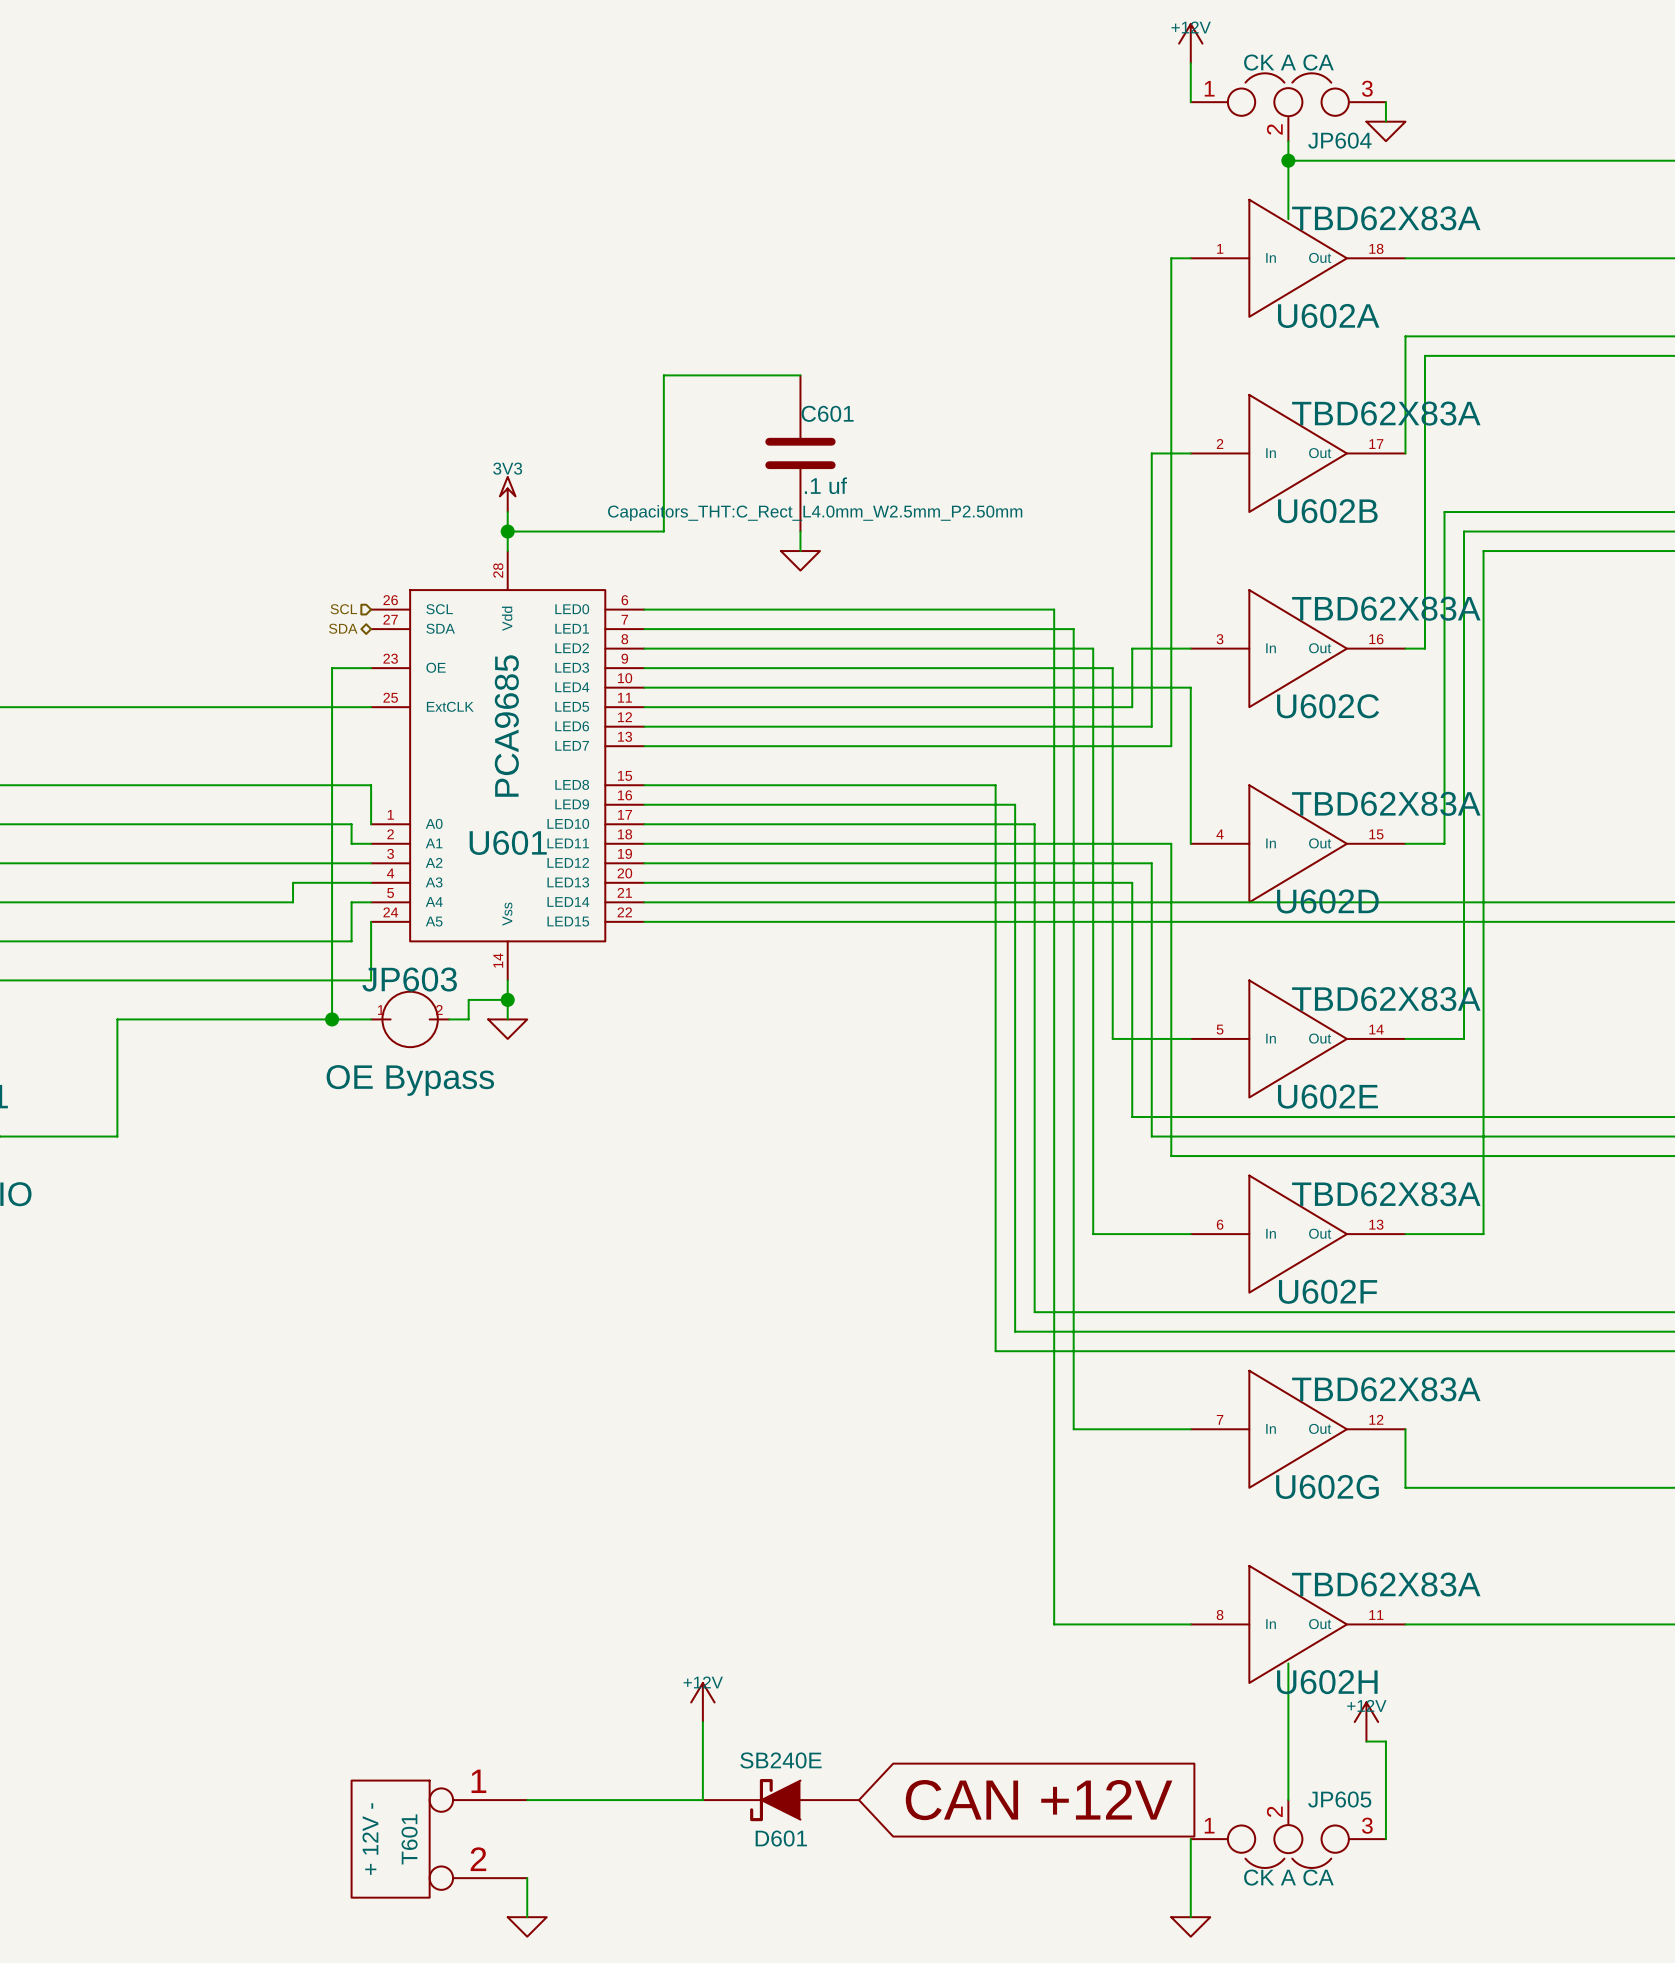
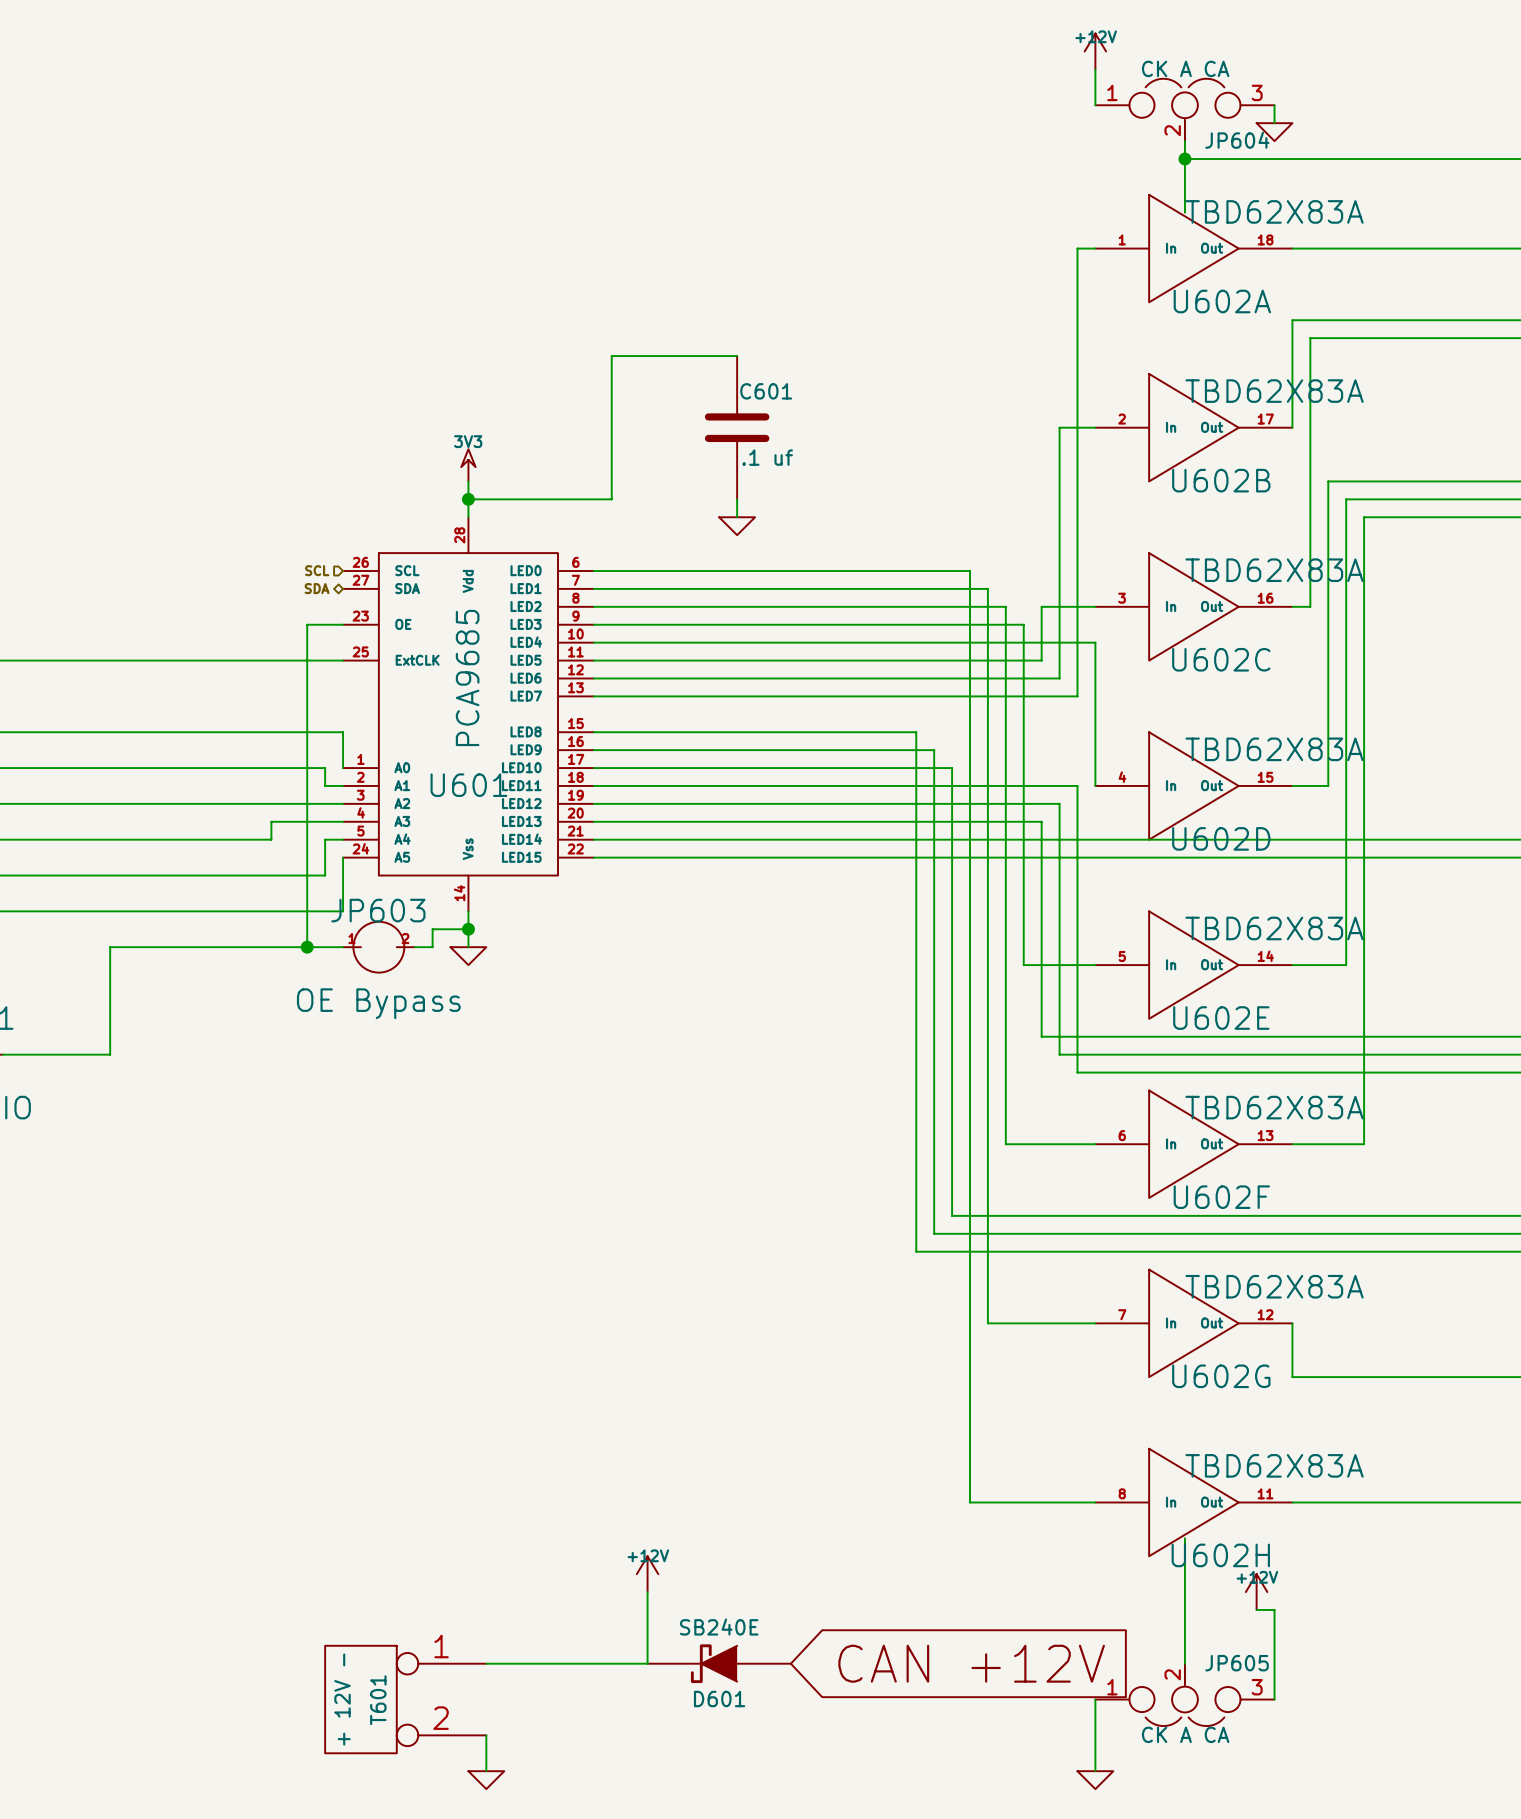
C601 text: Capacitors_THT:C_Rect_L4.0mm_W2.5mm_P2.50mm (815, 513) -> none

